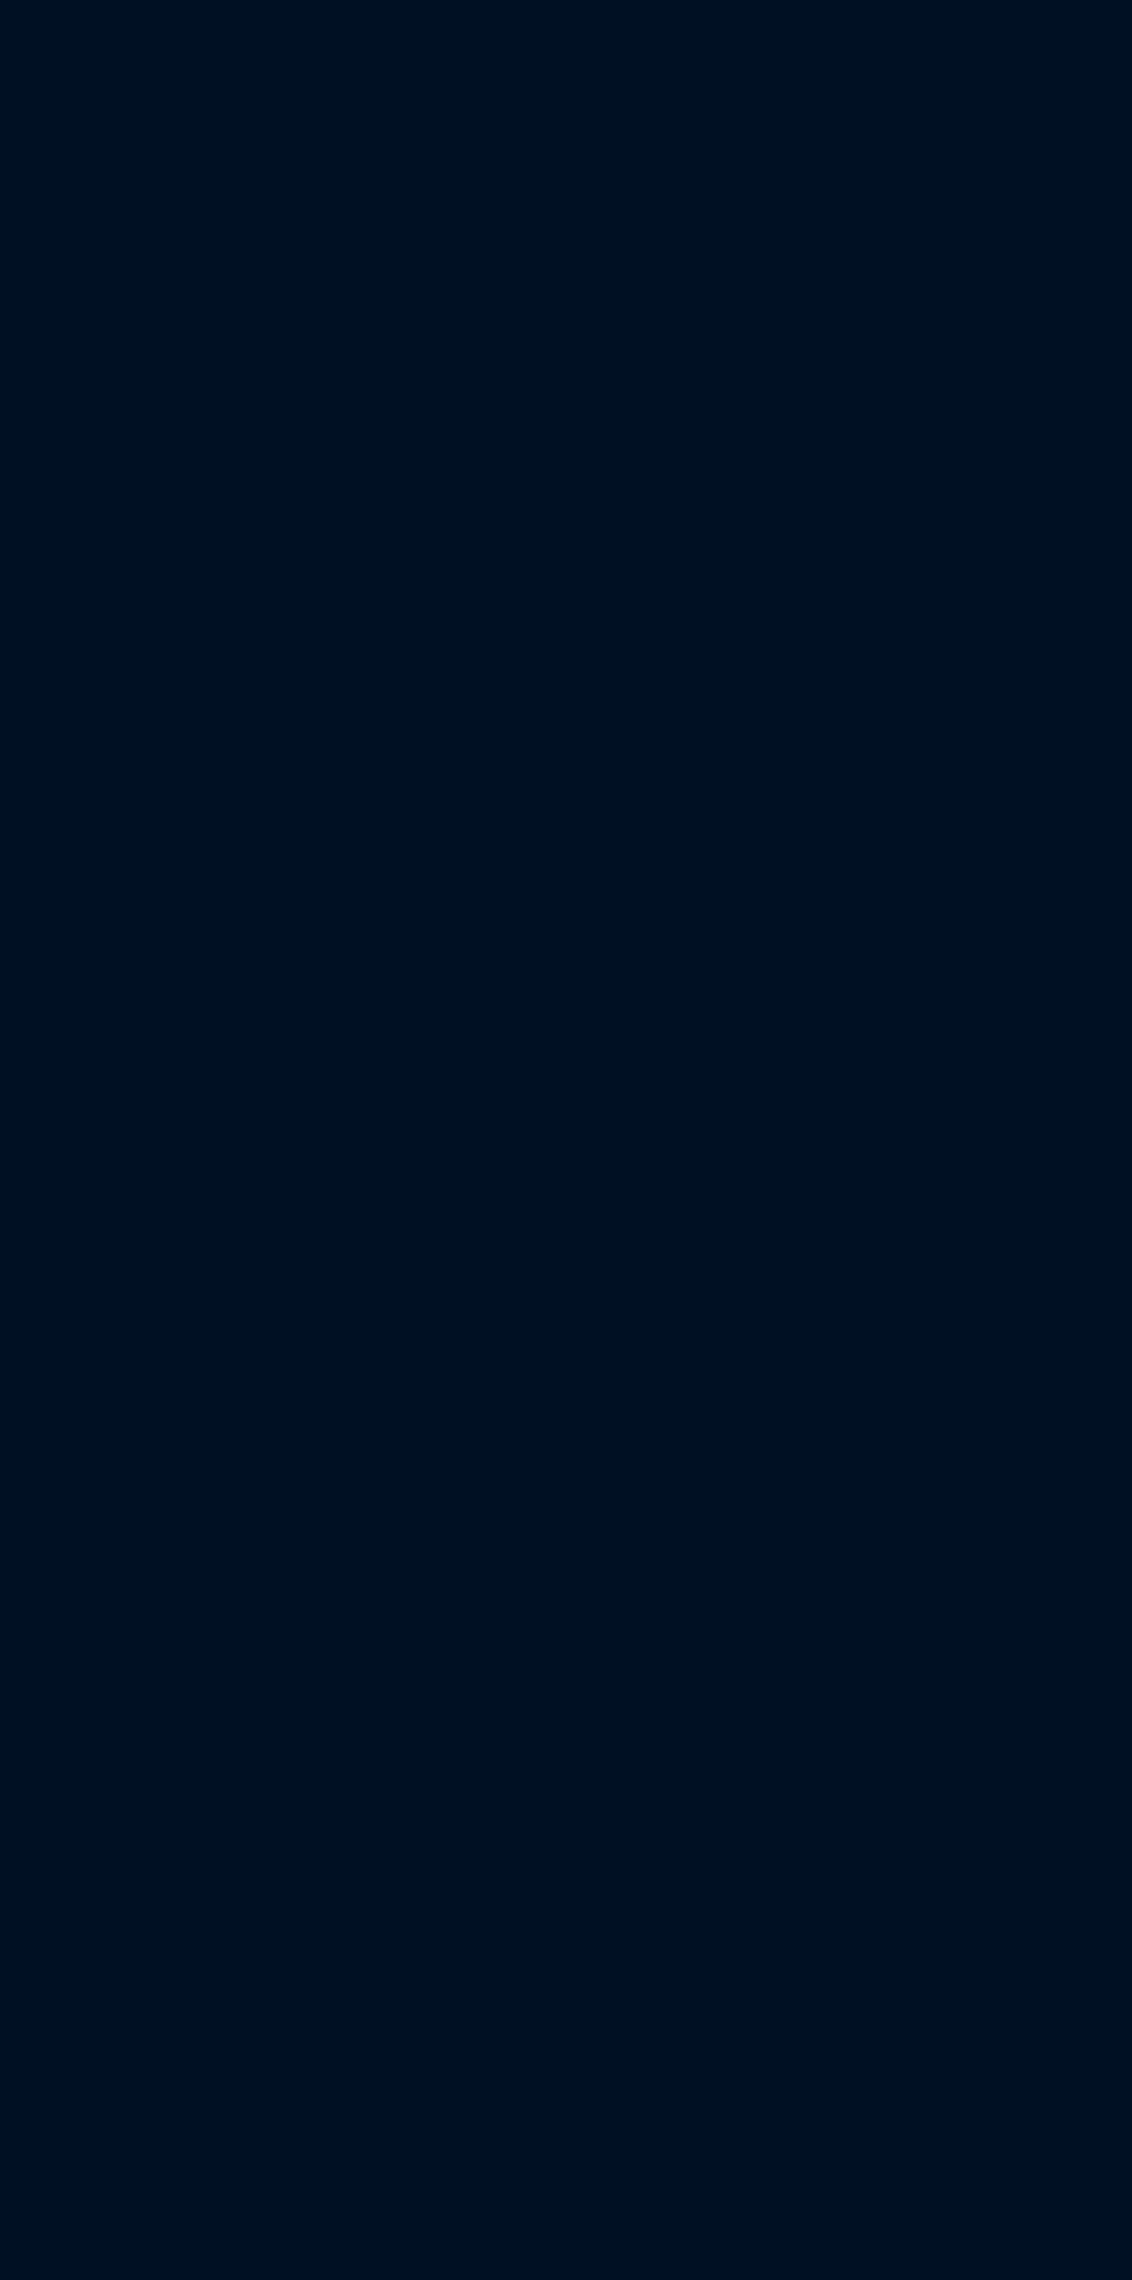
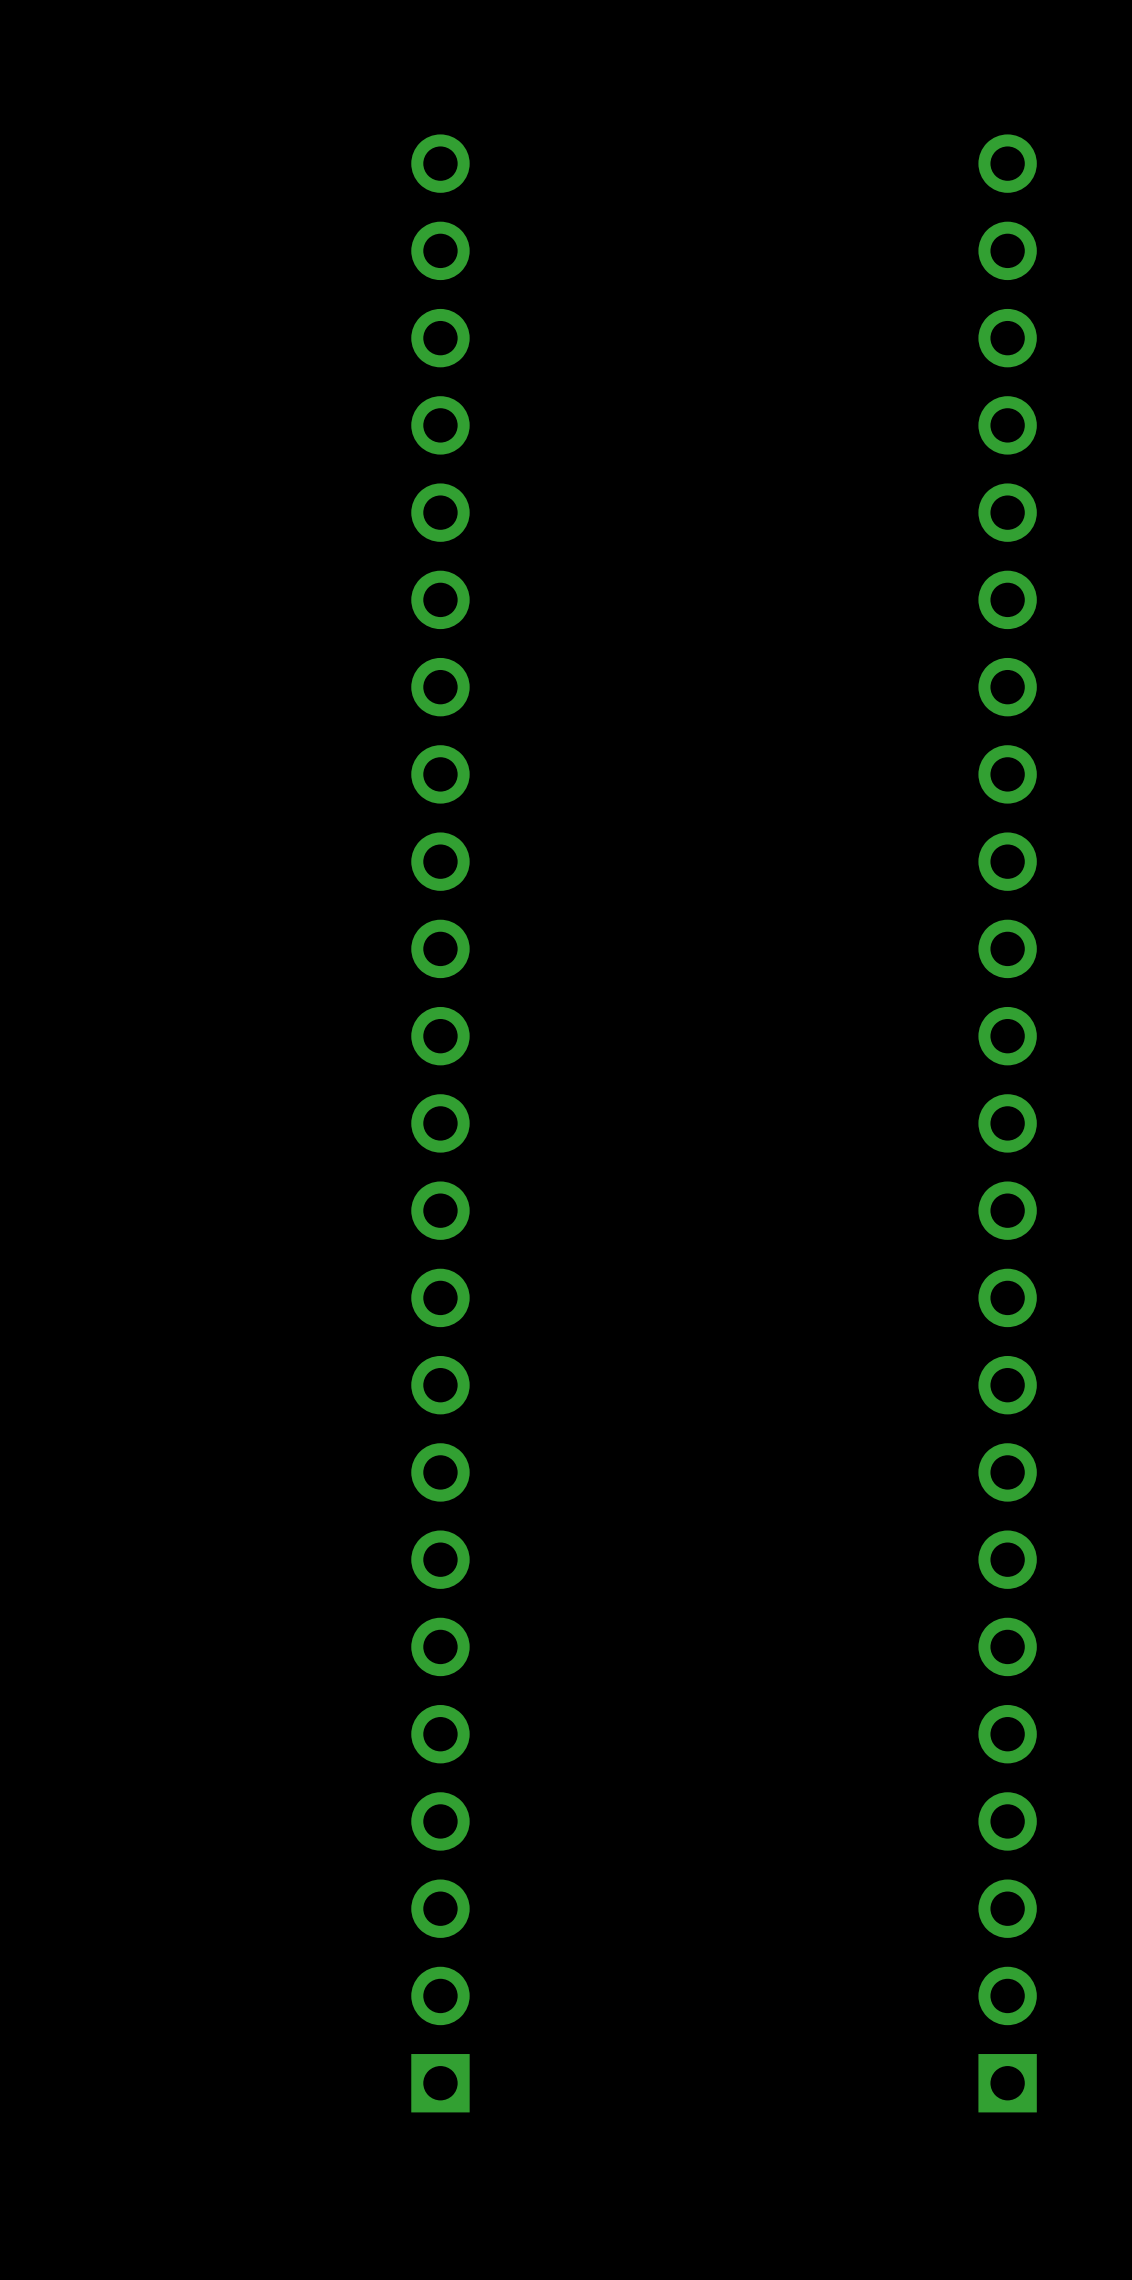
part: none -> (440, 1123)
part: none -> (1007, 1123)

